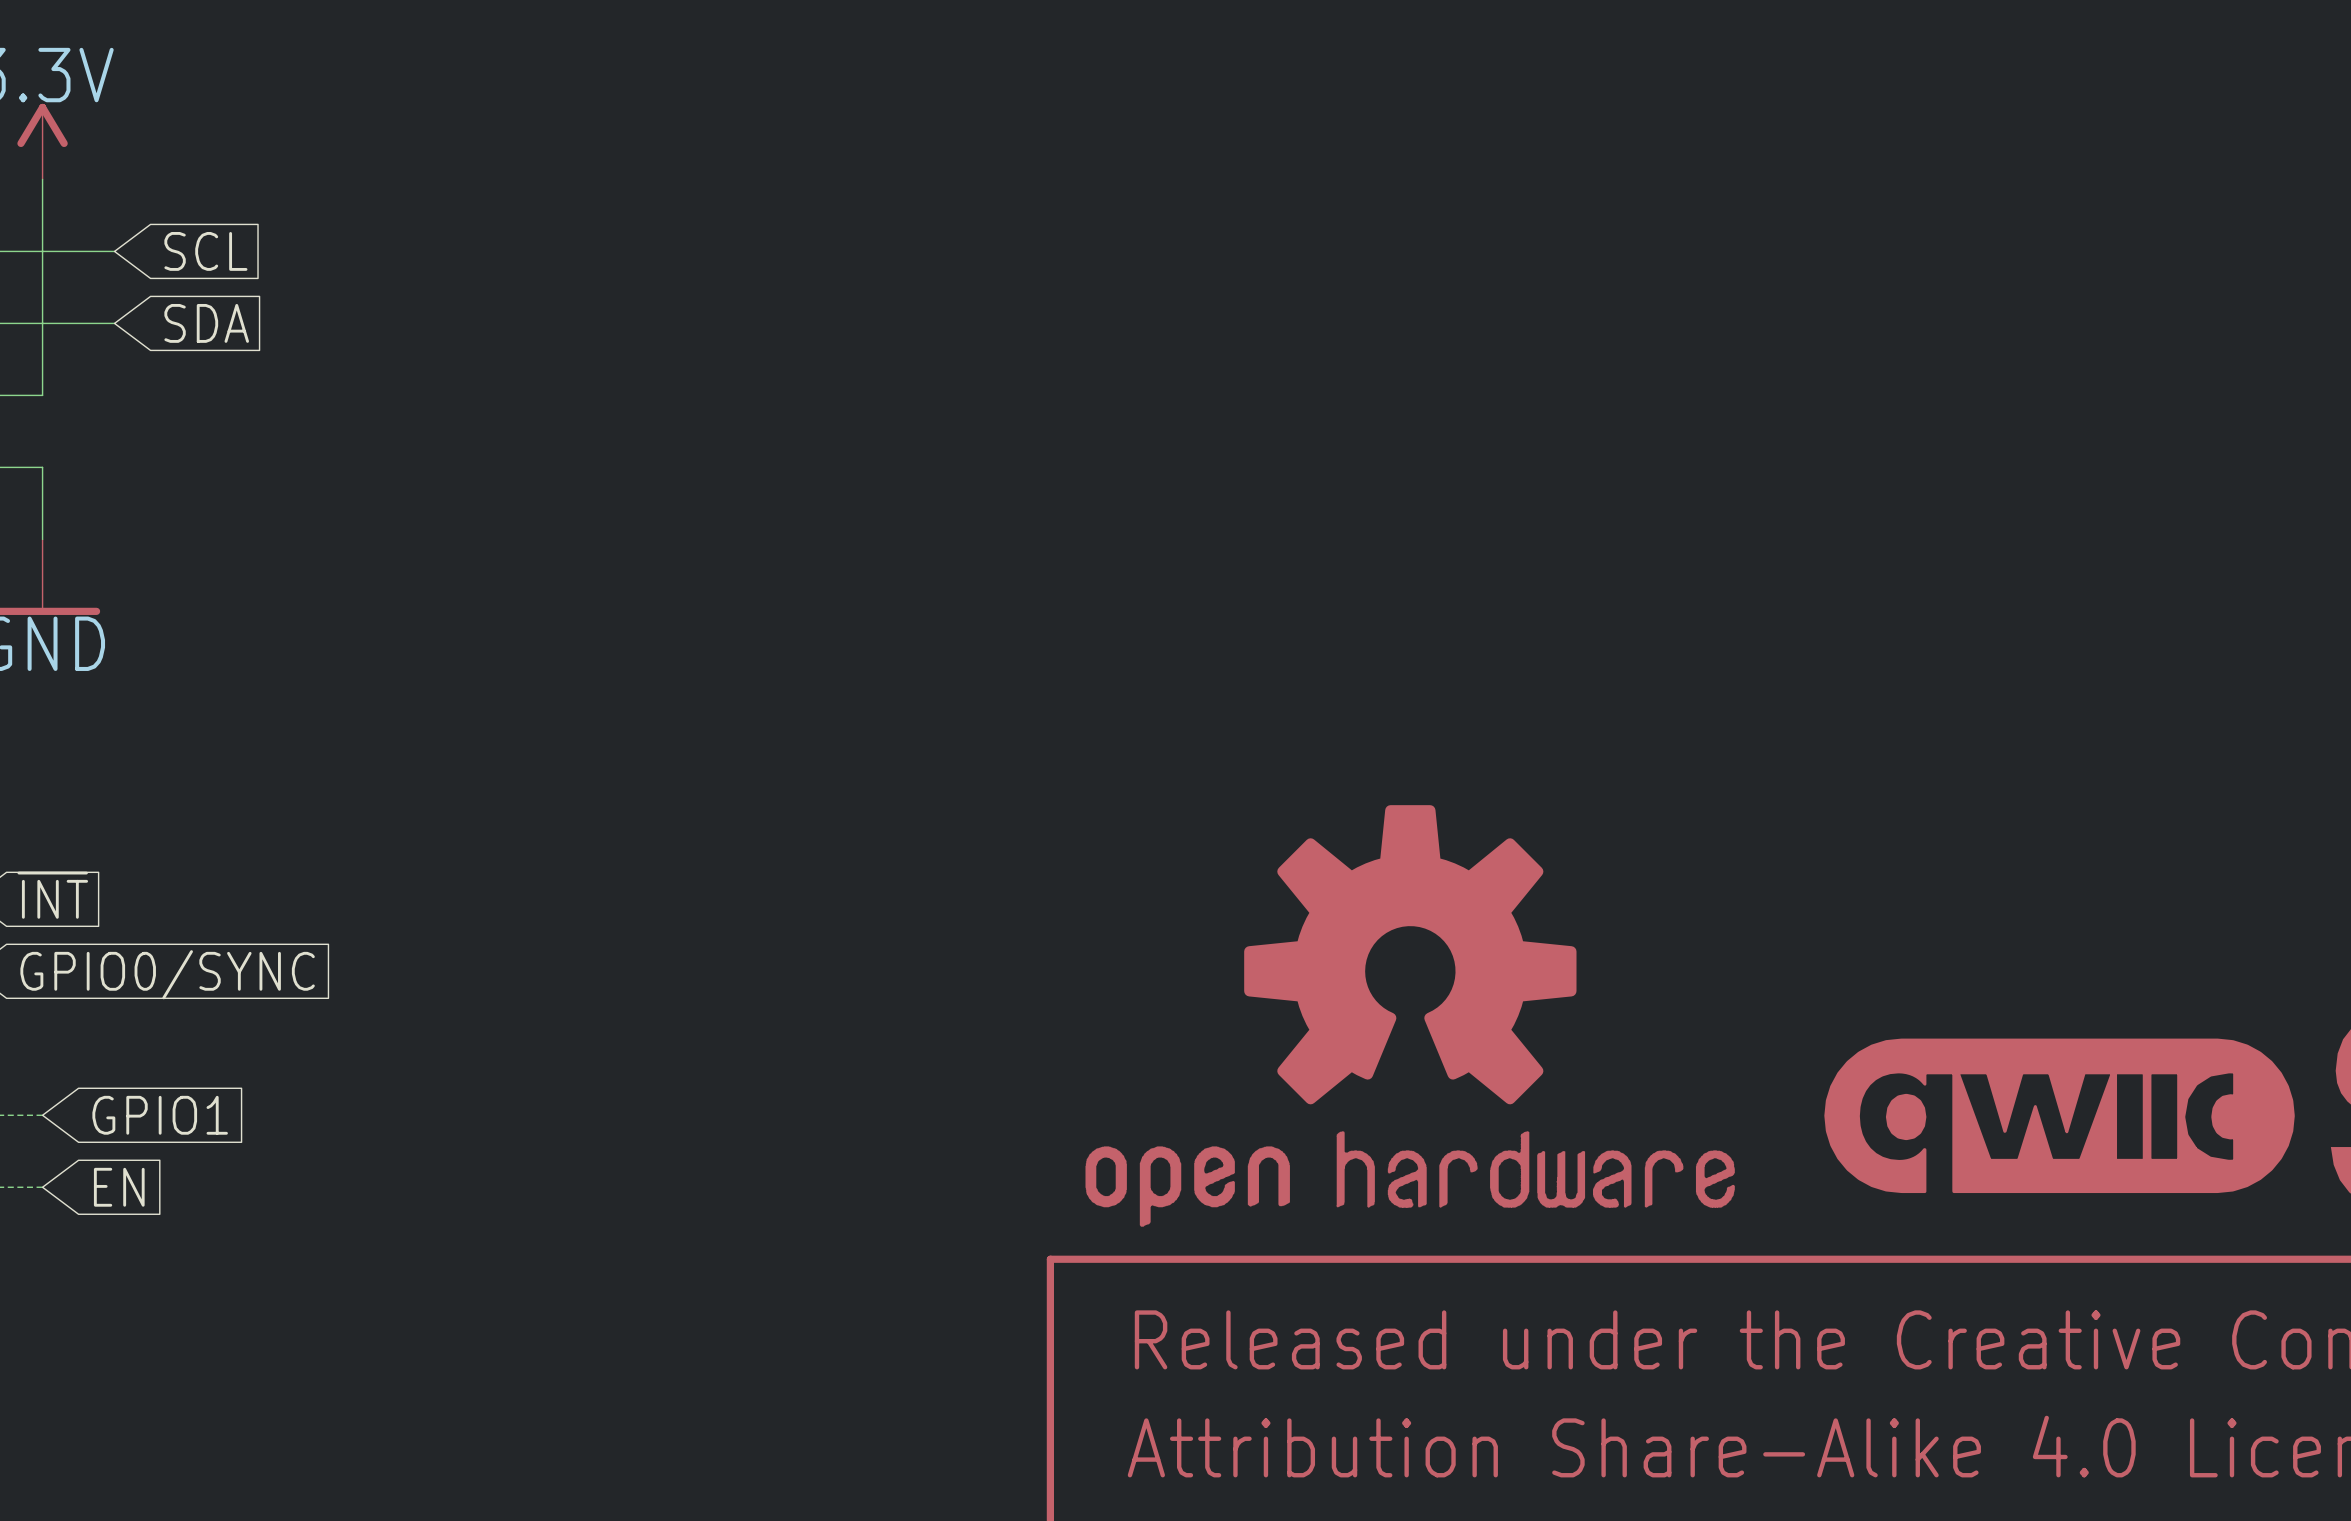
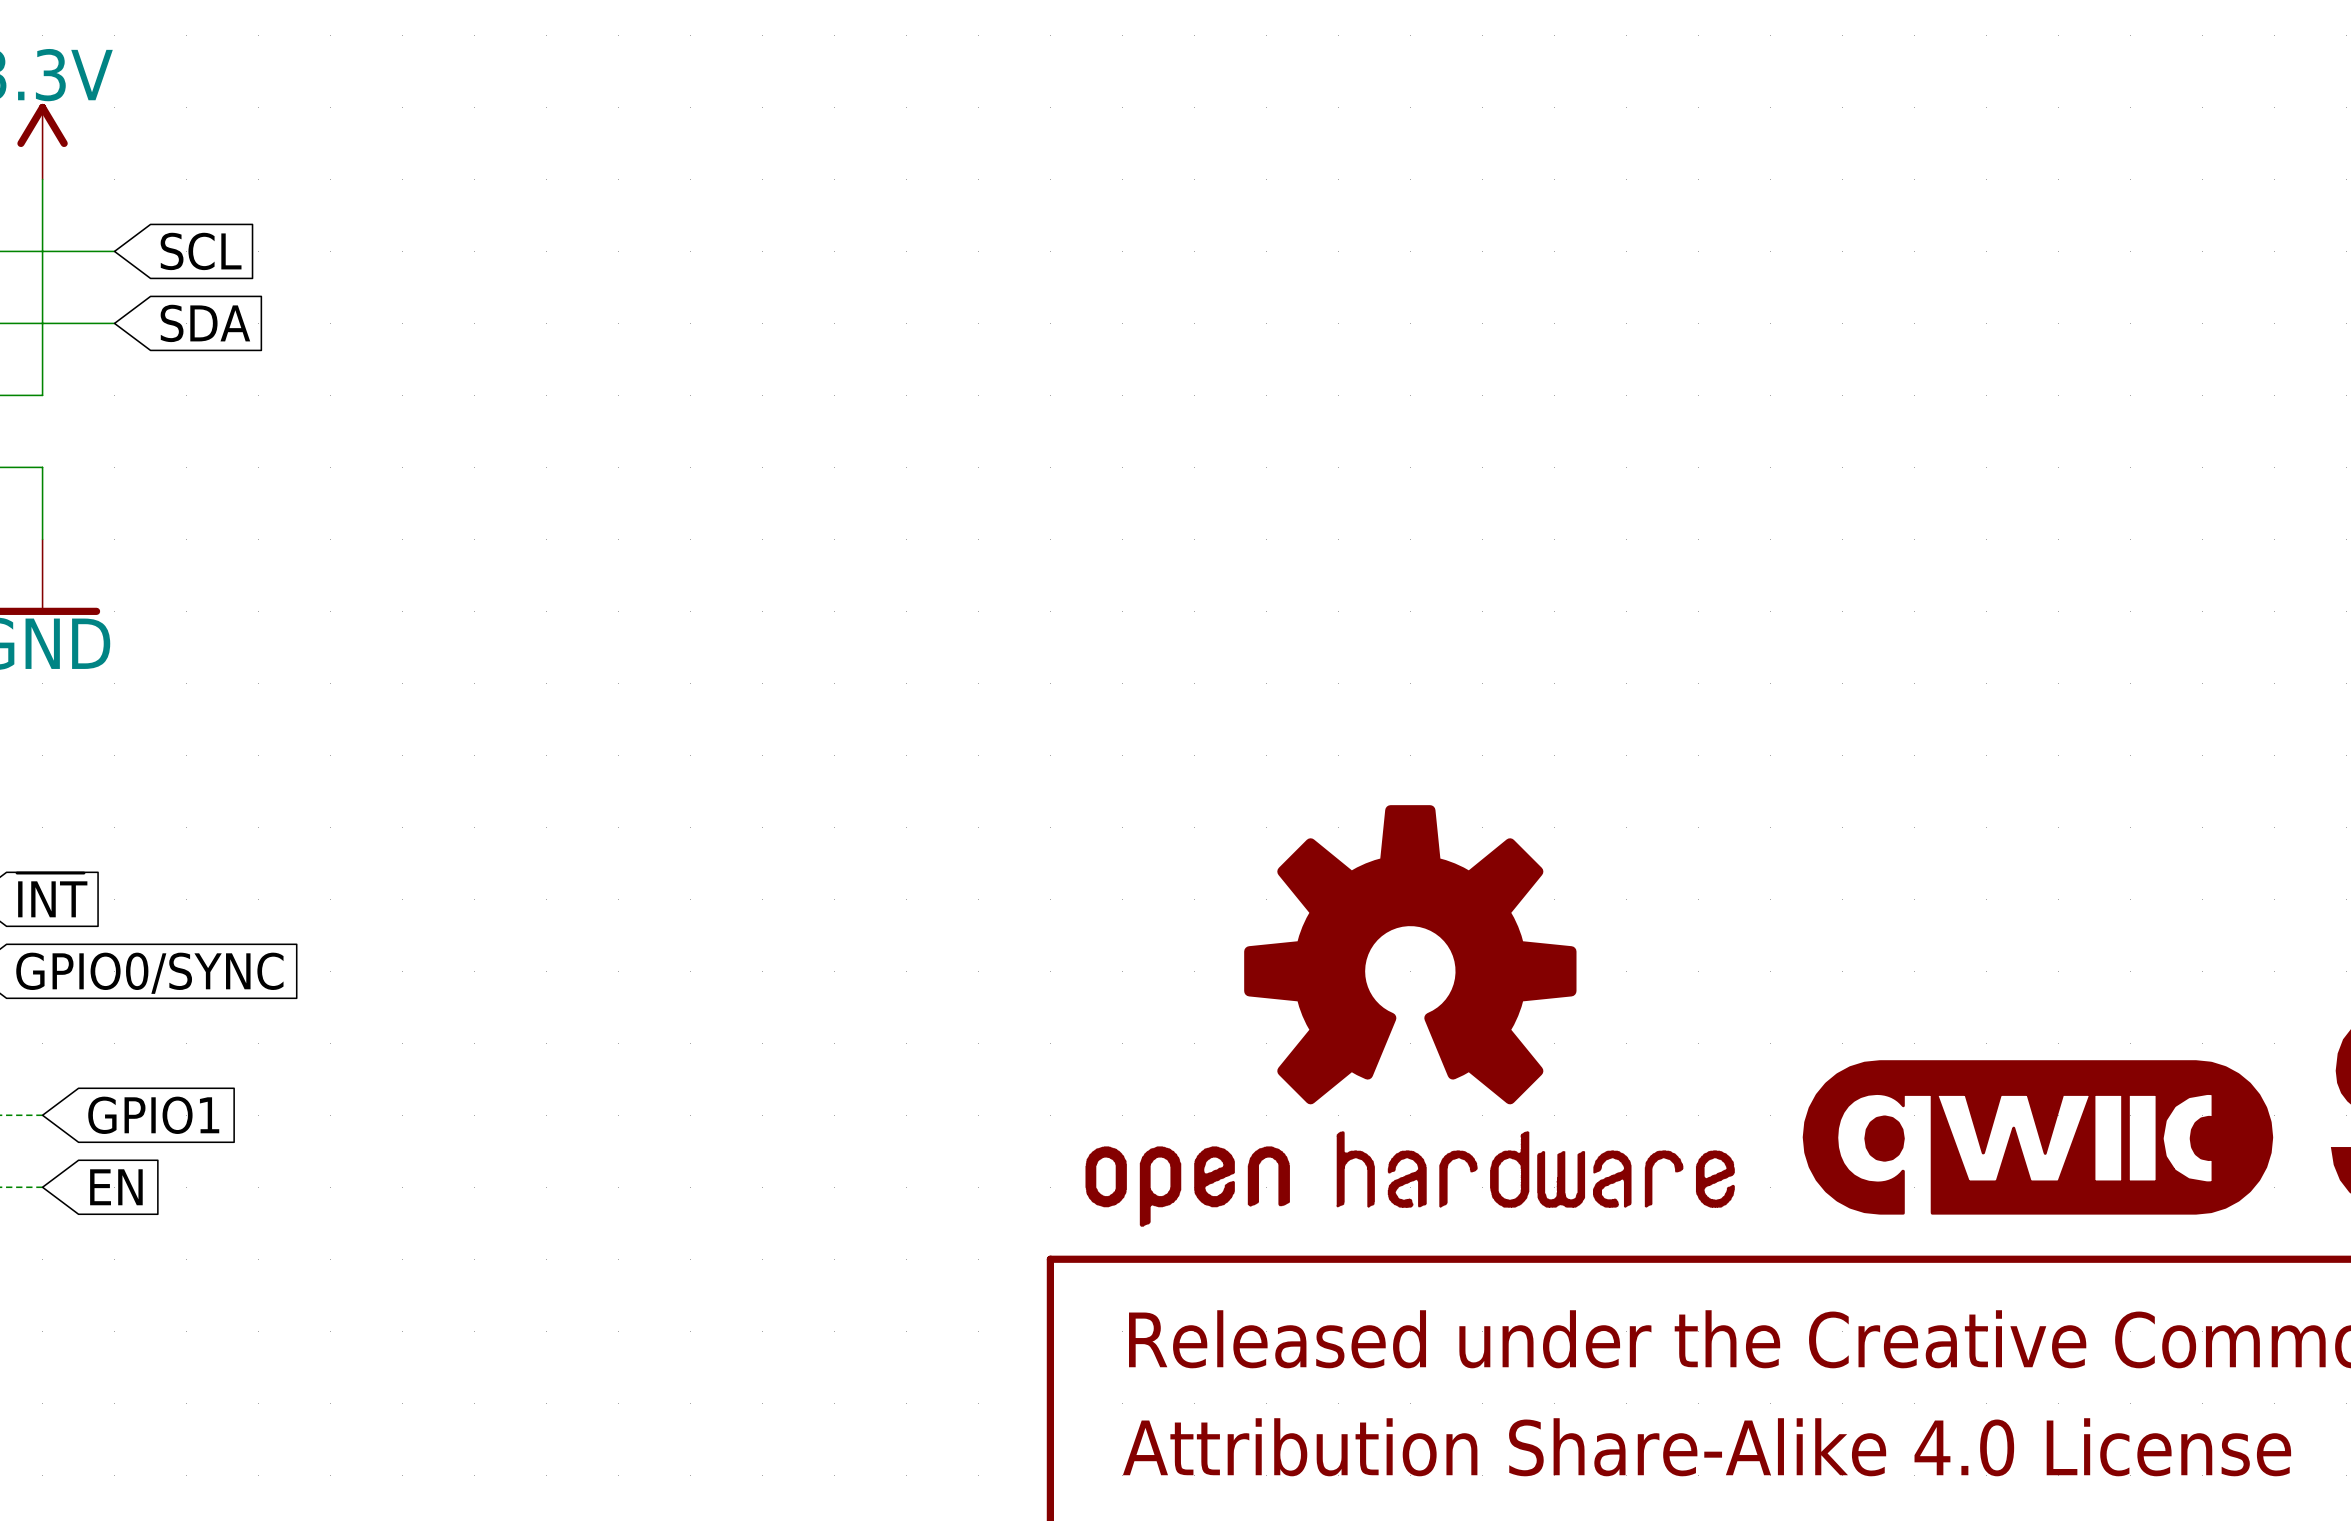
part position: (2059, 1115) -> (2037, 1137)

